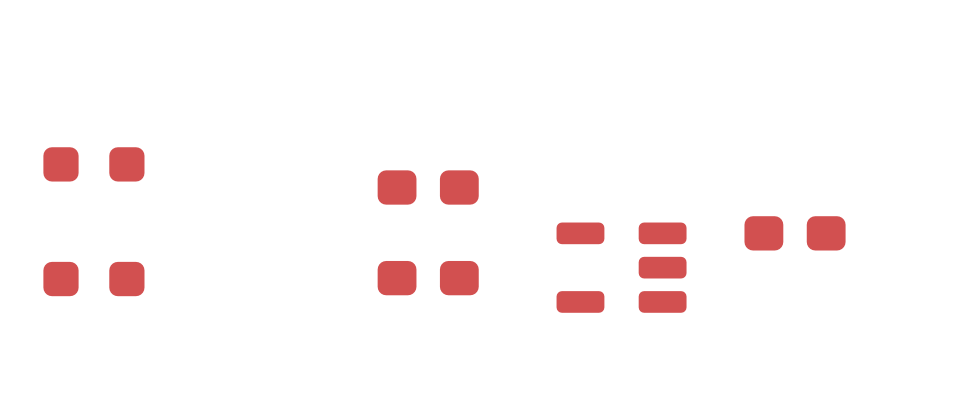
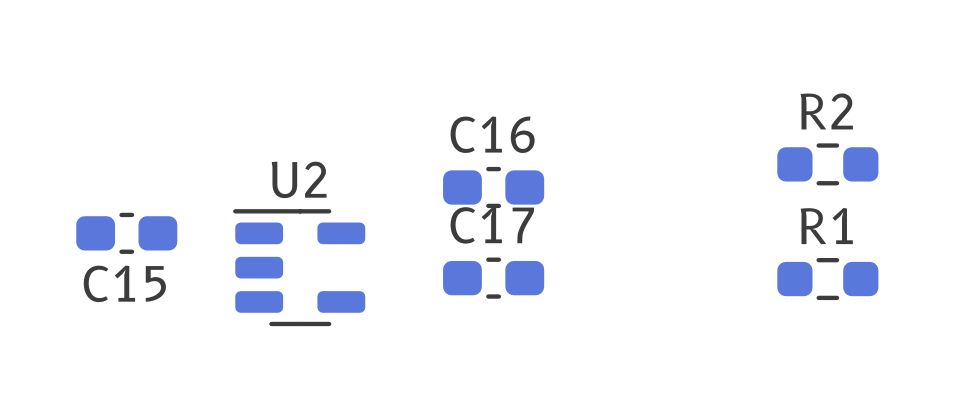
R2 side: top (93, 164) -> bottom (827, 164)
C16 side: top (428, 187) -> bottom (493, 187)
C15 side: top (795, 233) -> bottom (126, 233)
U2 side: top (621, 267) -> bottom (299, 267)
C17 side: top (428, 278) -> bottom (493, 278)
R1 side: top (93, 279) -> bottom (827, 279)

